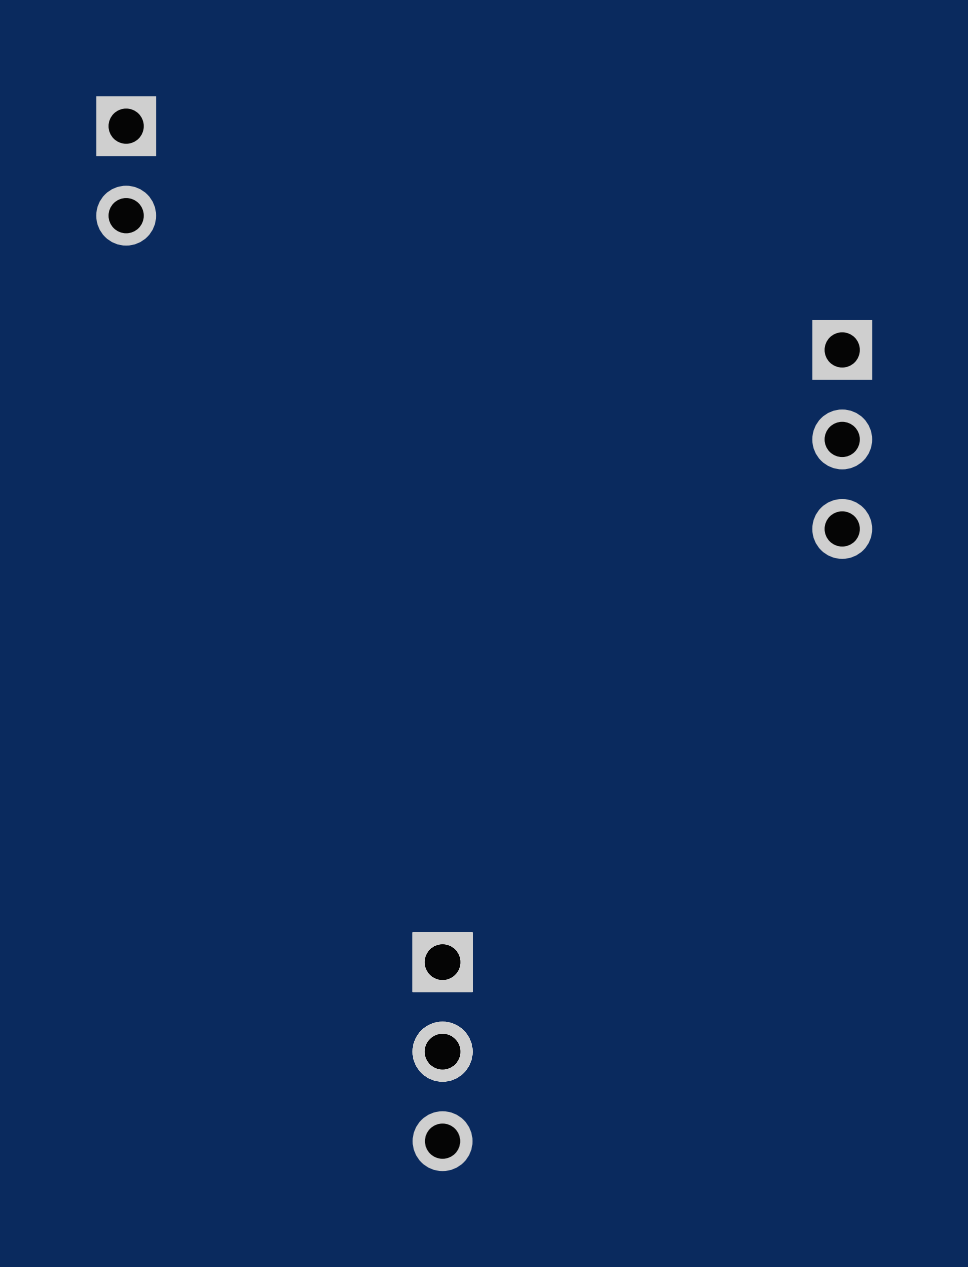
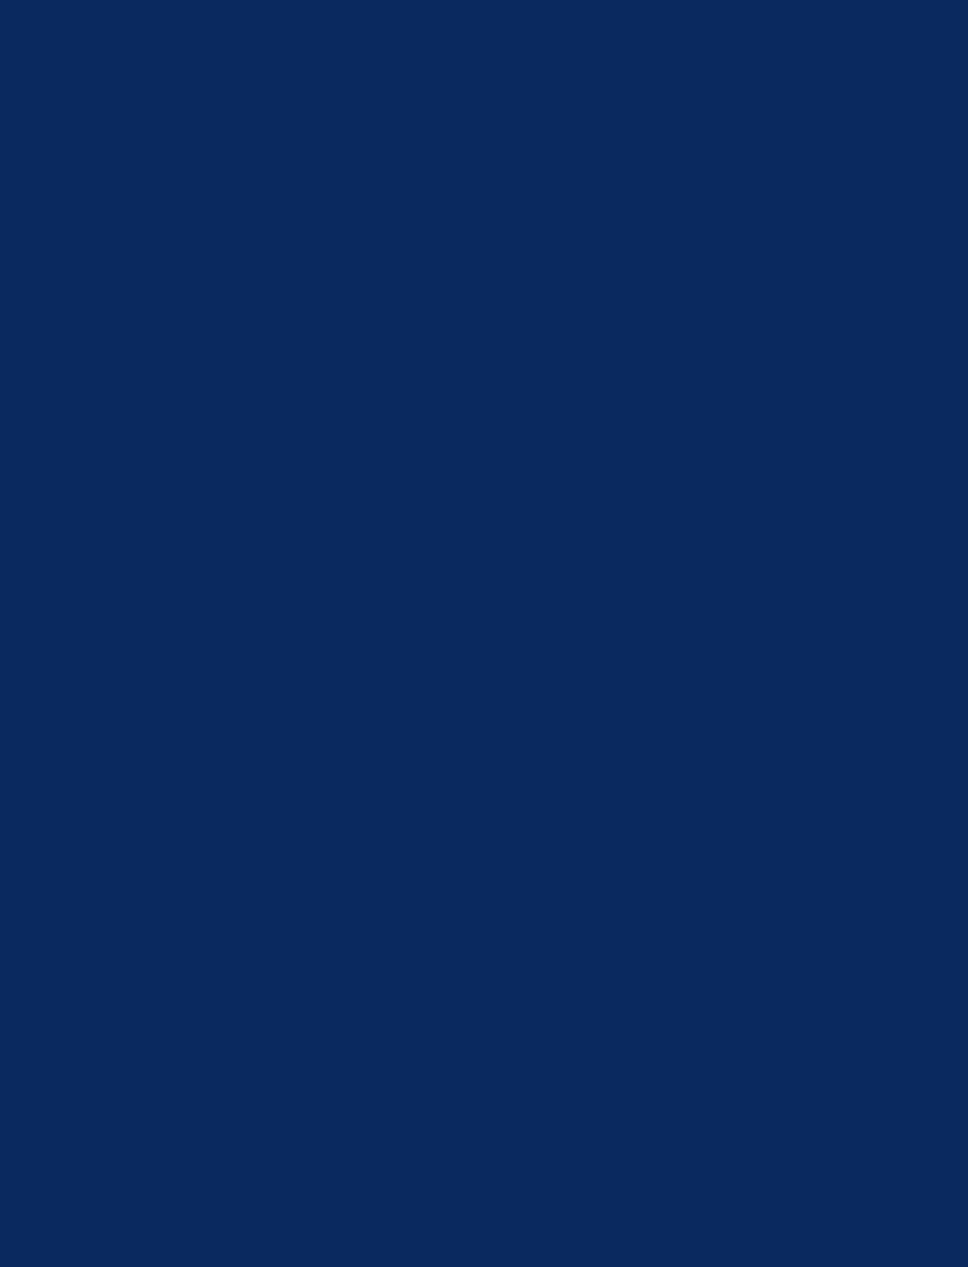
part: (126, 170) -> none
part: (842, 439) -> none
part: (442, 1006) -> none
part: (442, 1051) -> none

